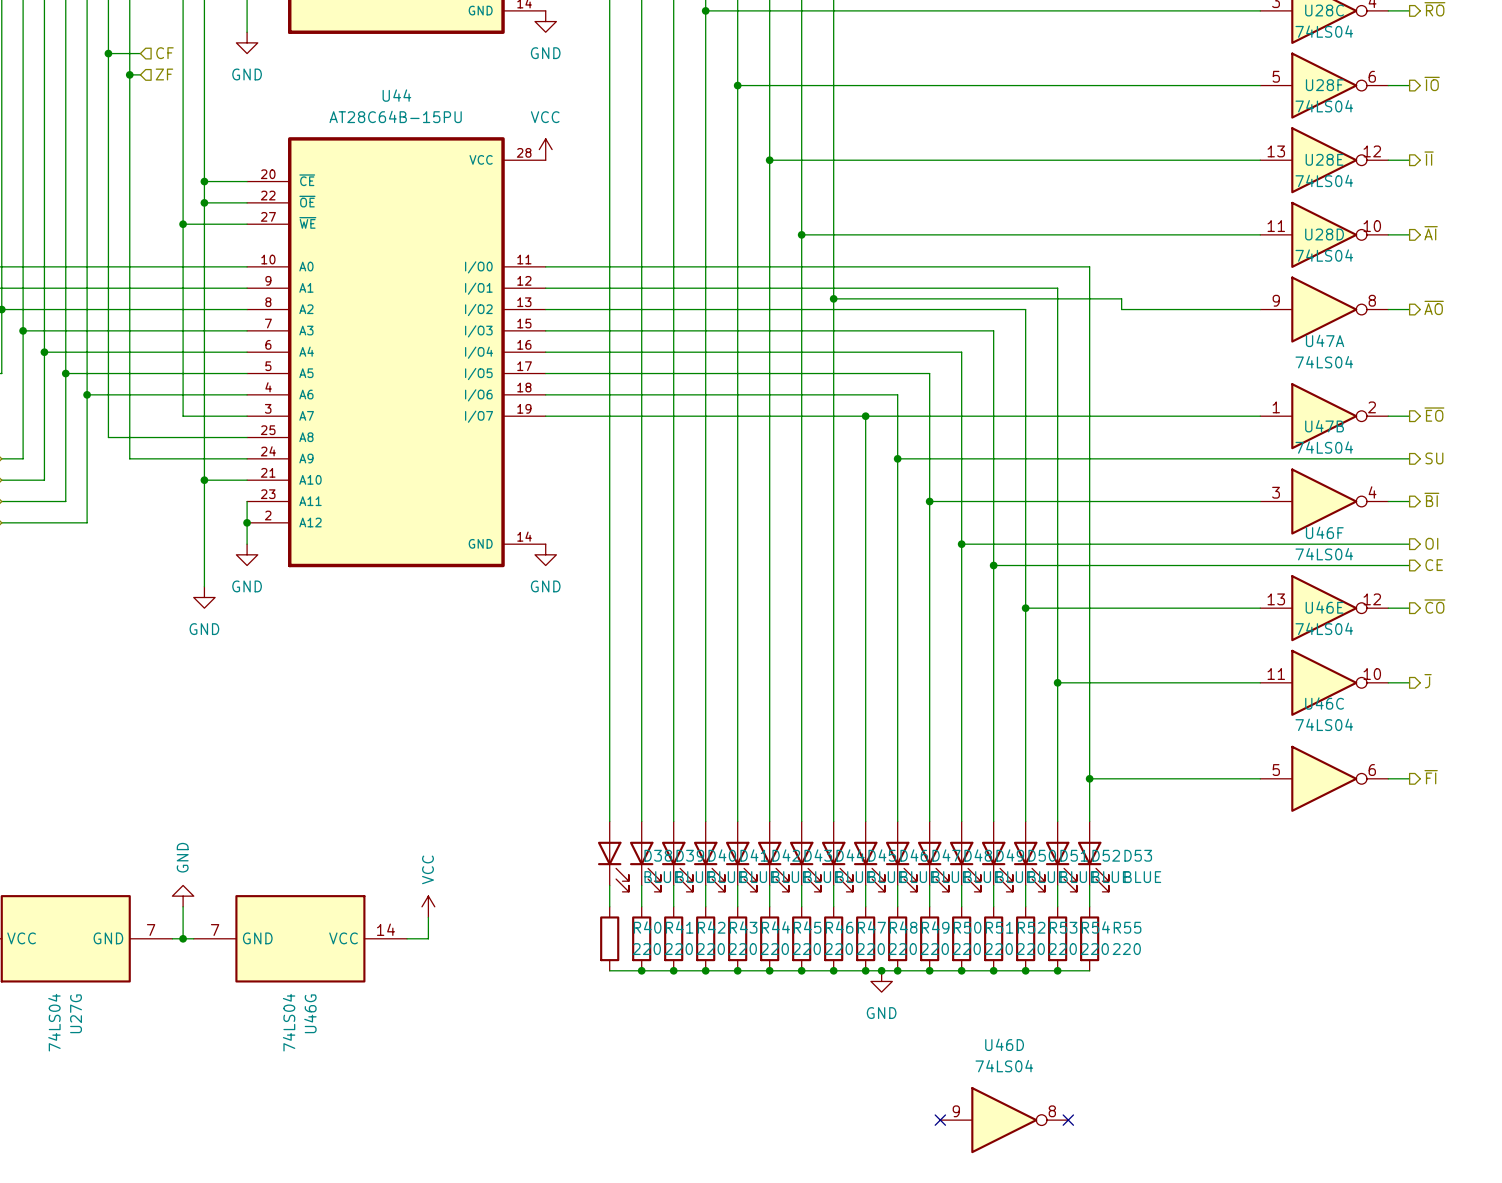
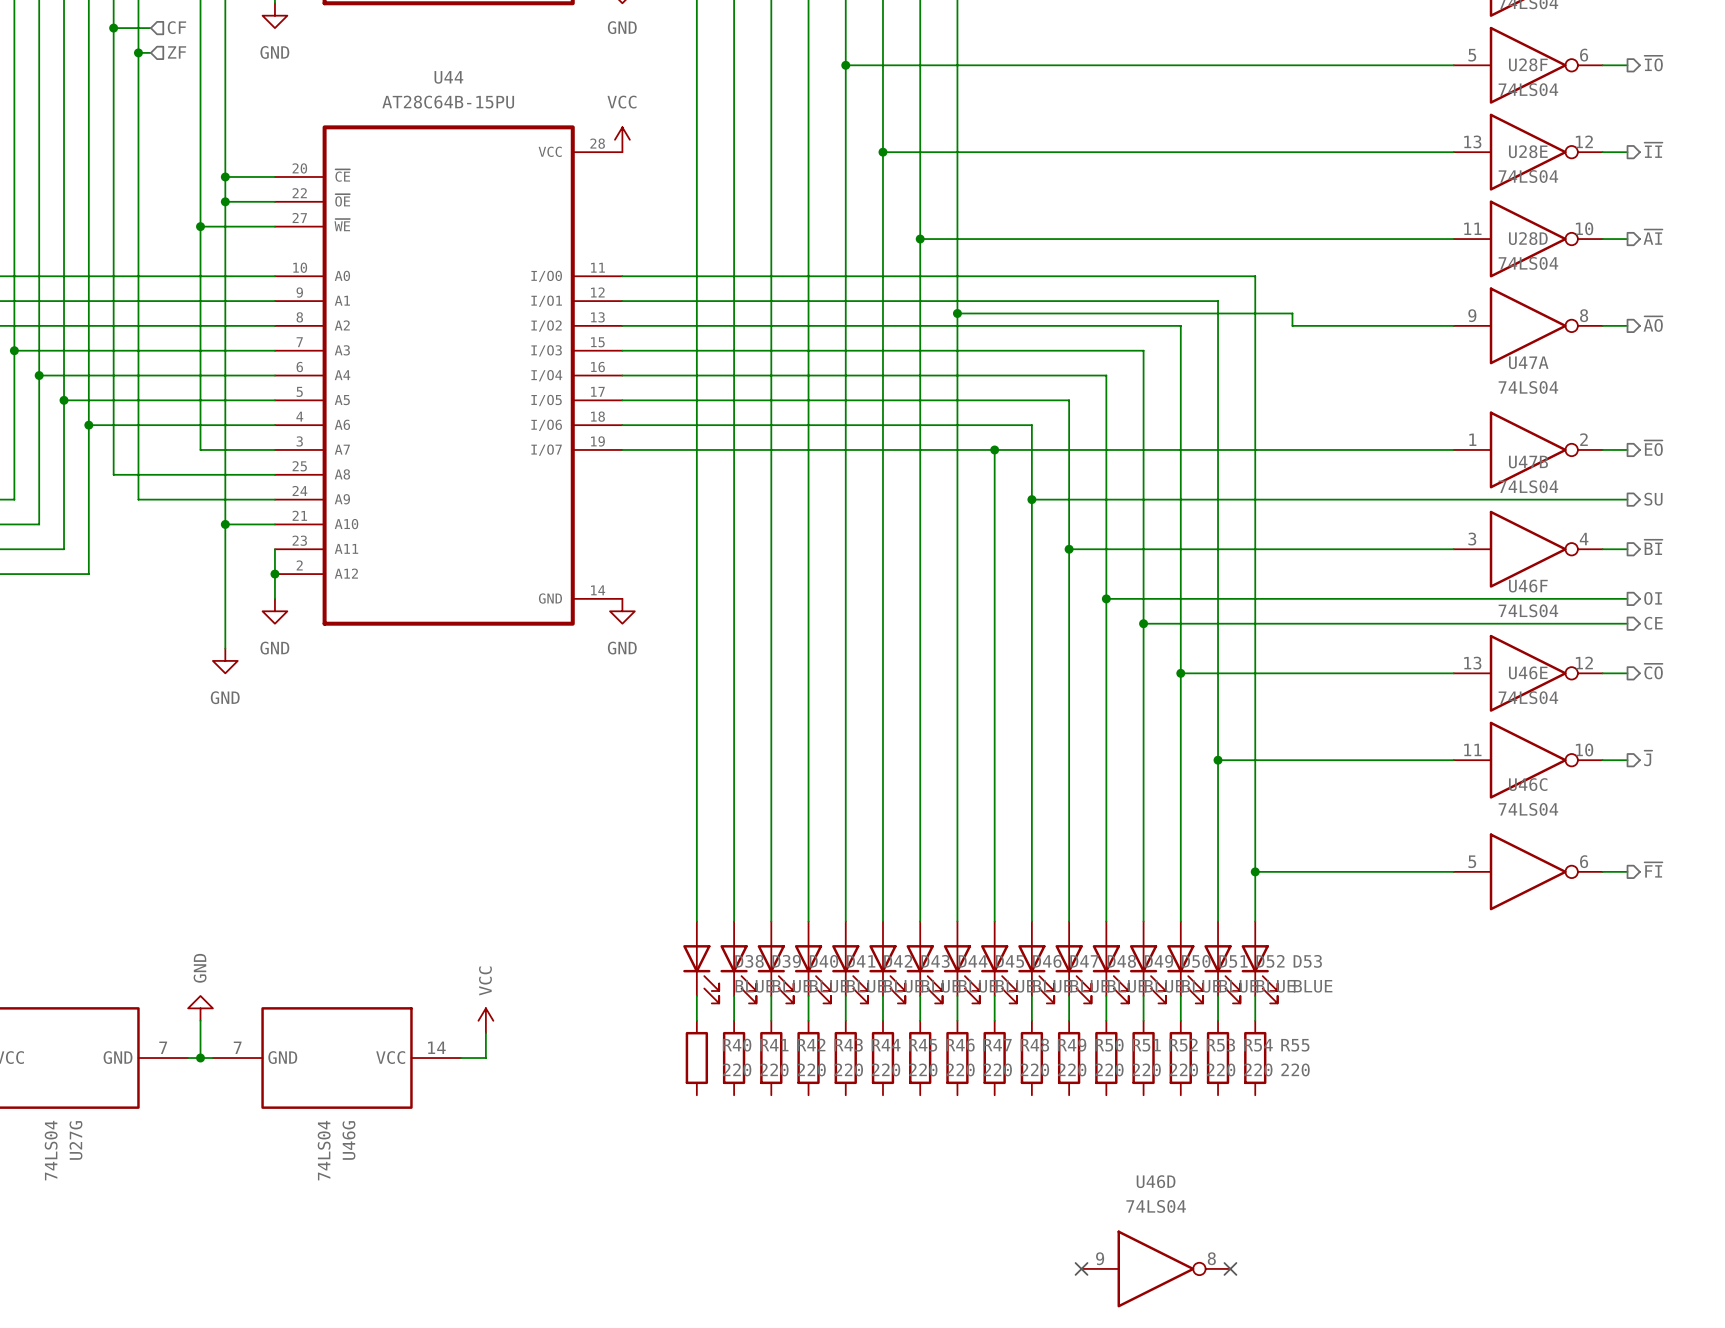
wire: (609, 970) (1089, 970) -> none
junction: (641, 970) -> none
junction: (673, 970) -> none
junction: (705, 970) -> none
junction: (737, 970) -> none
junction: (769, 970) -> none
junction: (801, 970) -> none
junction: (833, 970) -> none
junction: (865, 970) -> none
junction: (881, 970) -> none
junction: (897, 970) -> none
junction: (929, 970) -> none
junction: (961, 970) -> none
junction: (993, 970) -> none
junction: (1025, 970) -> none
junction: (1057, 970) -> none
power symbol: GND (881, 981) -> none

